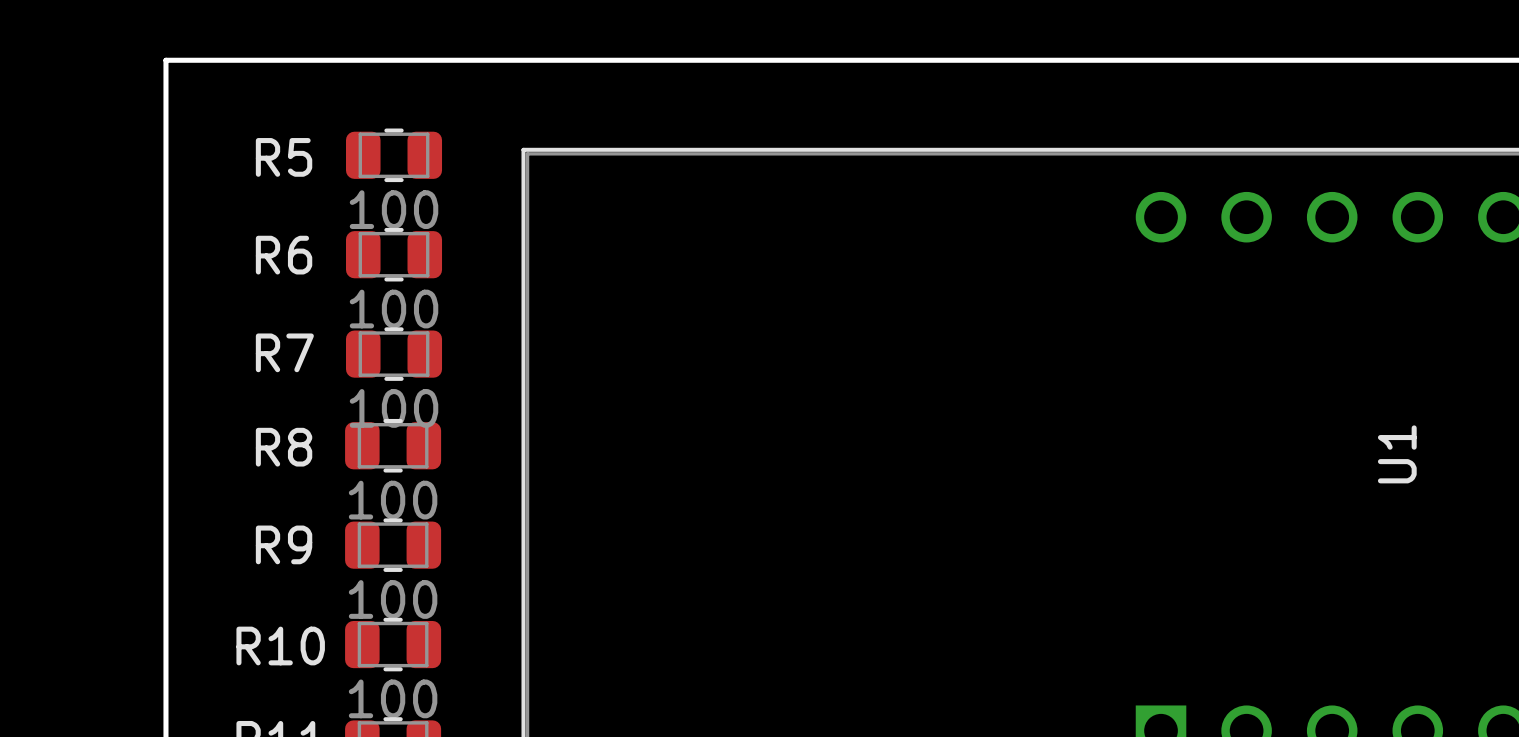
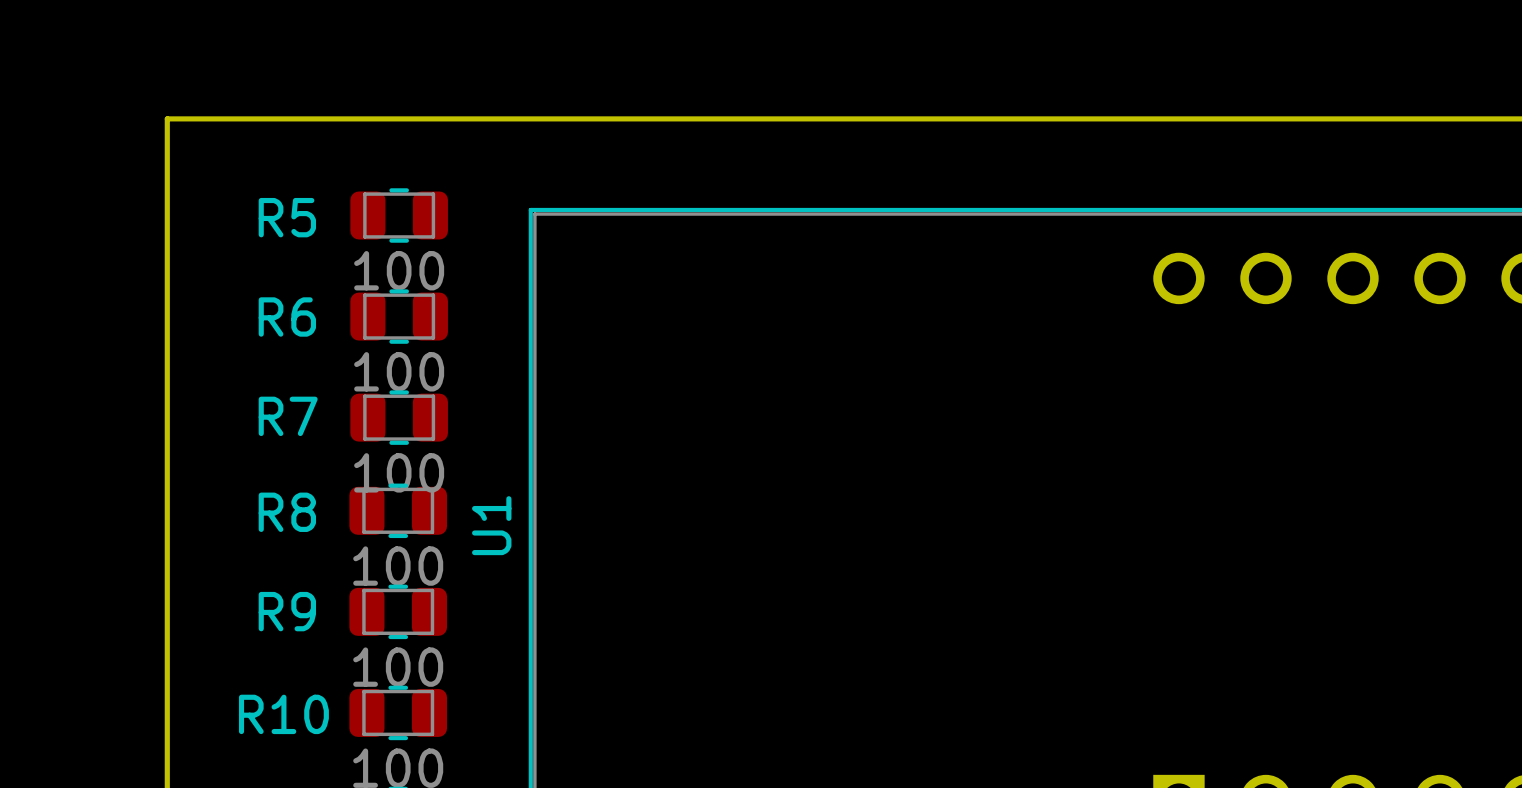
U1 name position: U1 (1397, 454) -> U1 (491, 525)

